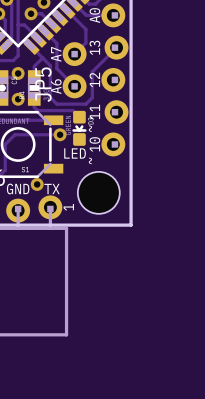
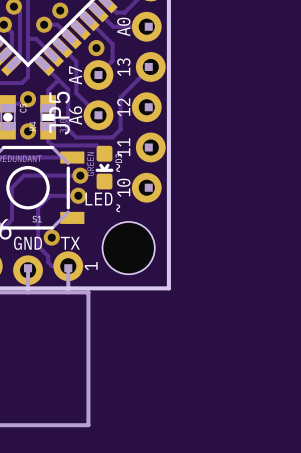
via: none -> (96, 48)
track: none -> (78, 195) (50, 195) (38, 207) (38, 246) (48, 256) (48, 262) (52, 266) (68, 266)
via: none -> (78, 195)

